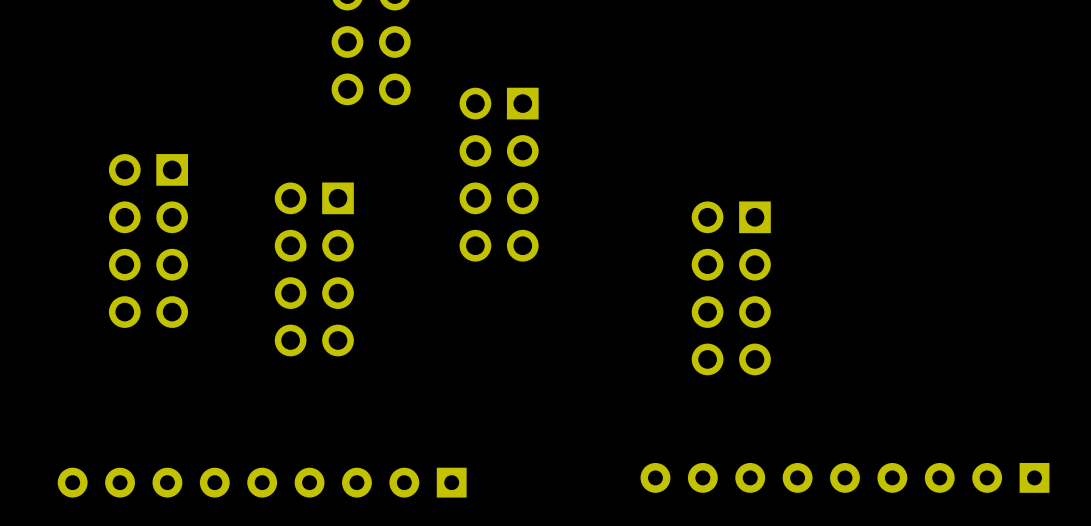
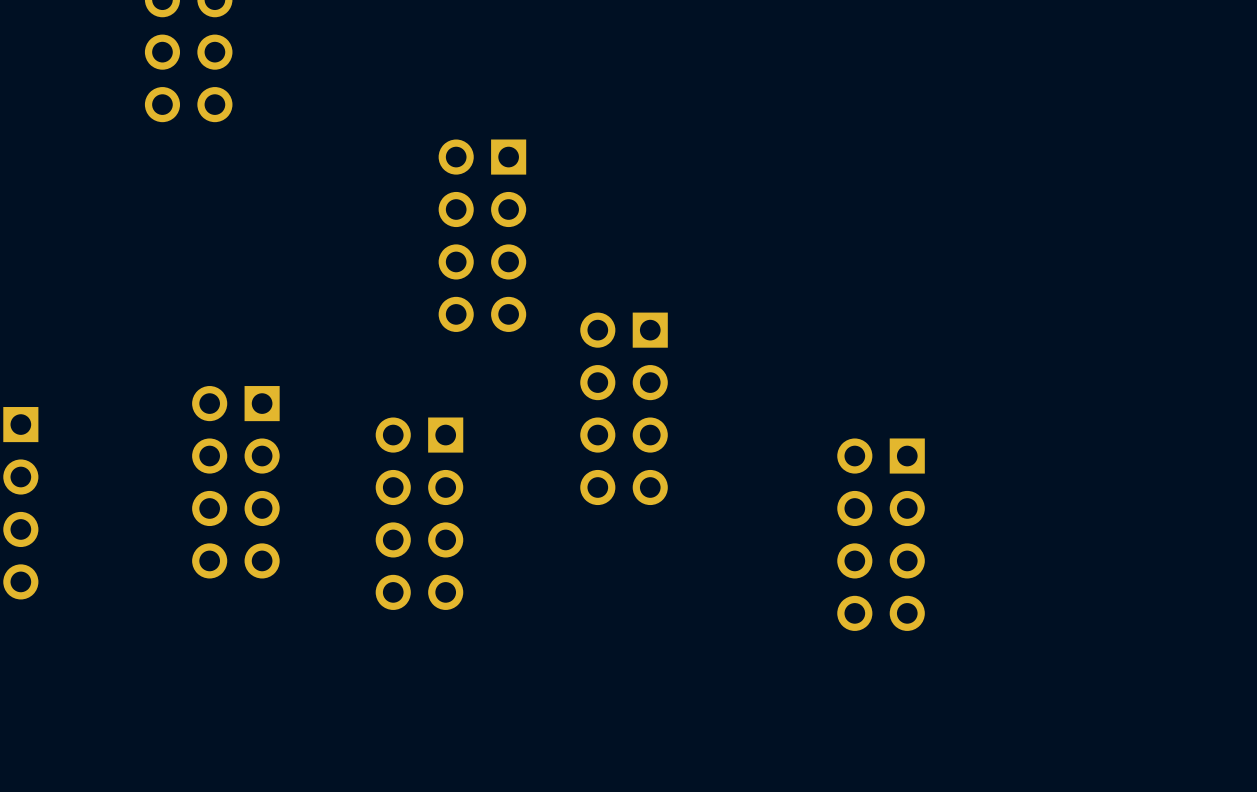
part: (844, 477) -> none
part: (262, 482) -> none

